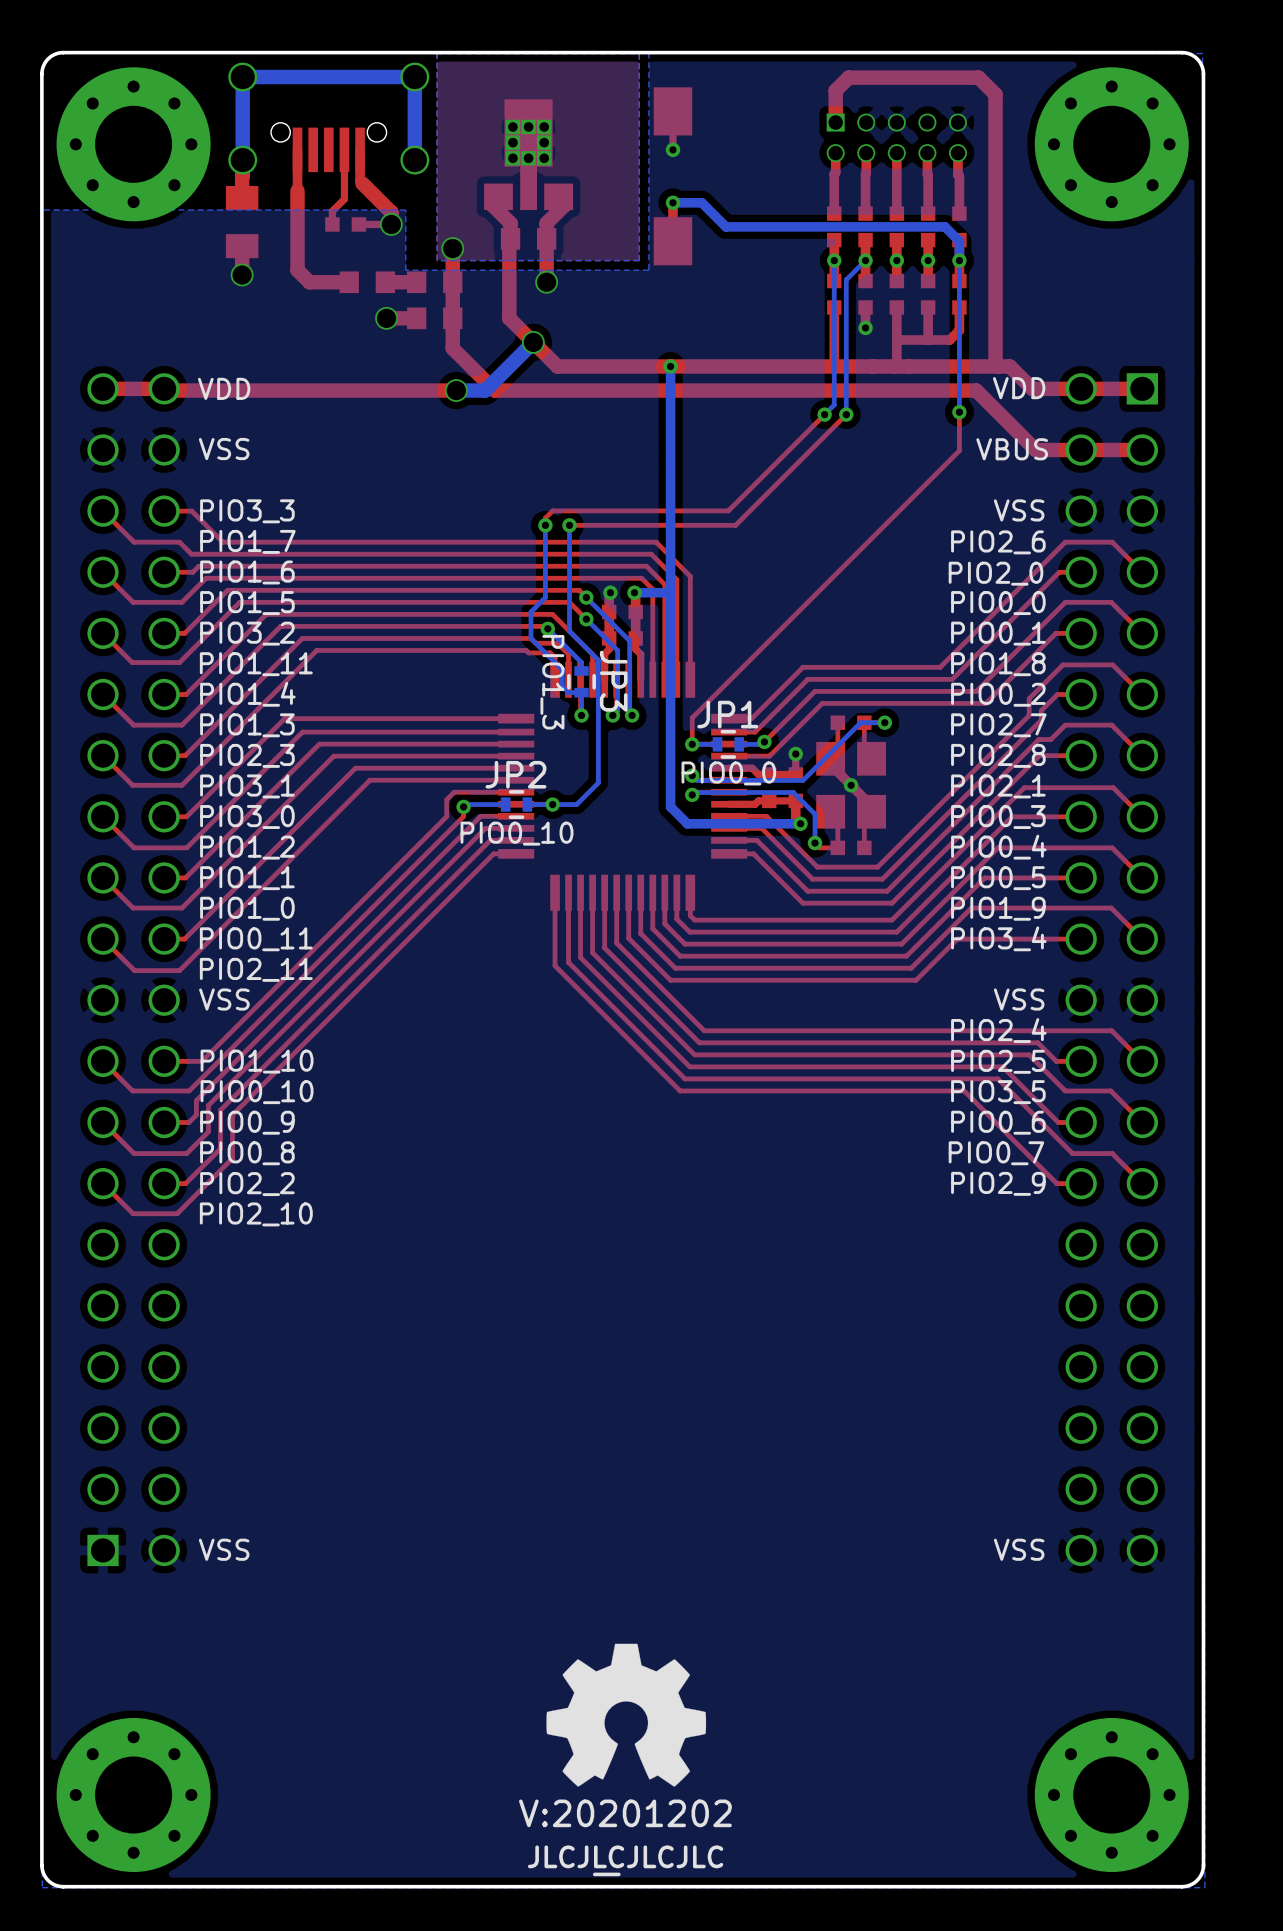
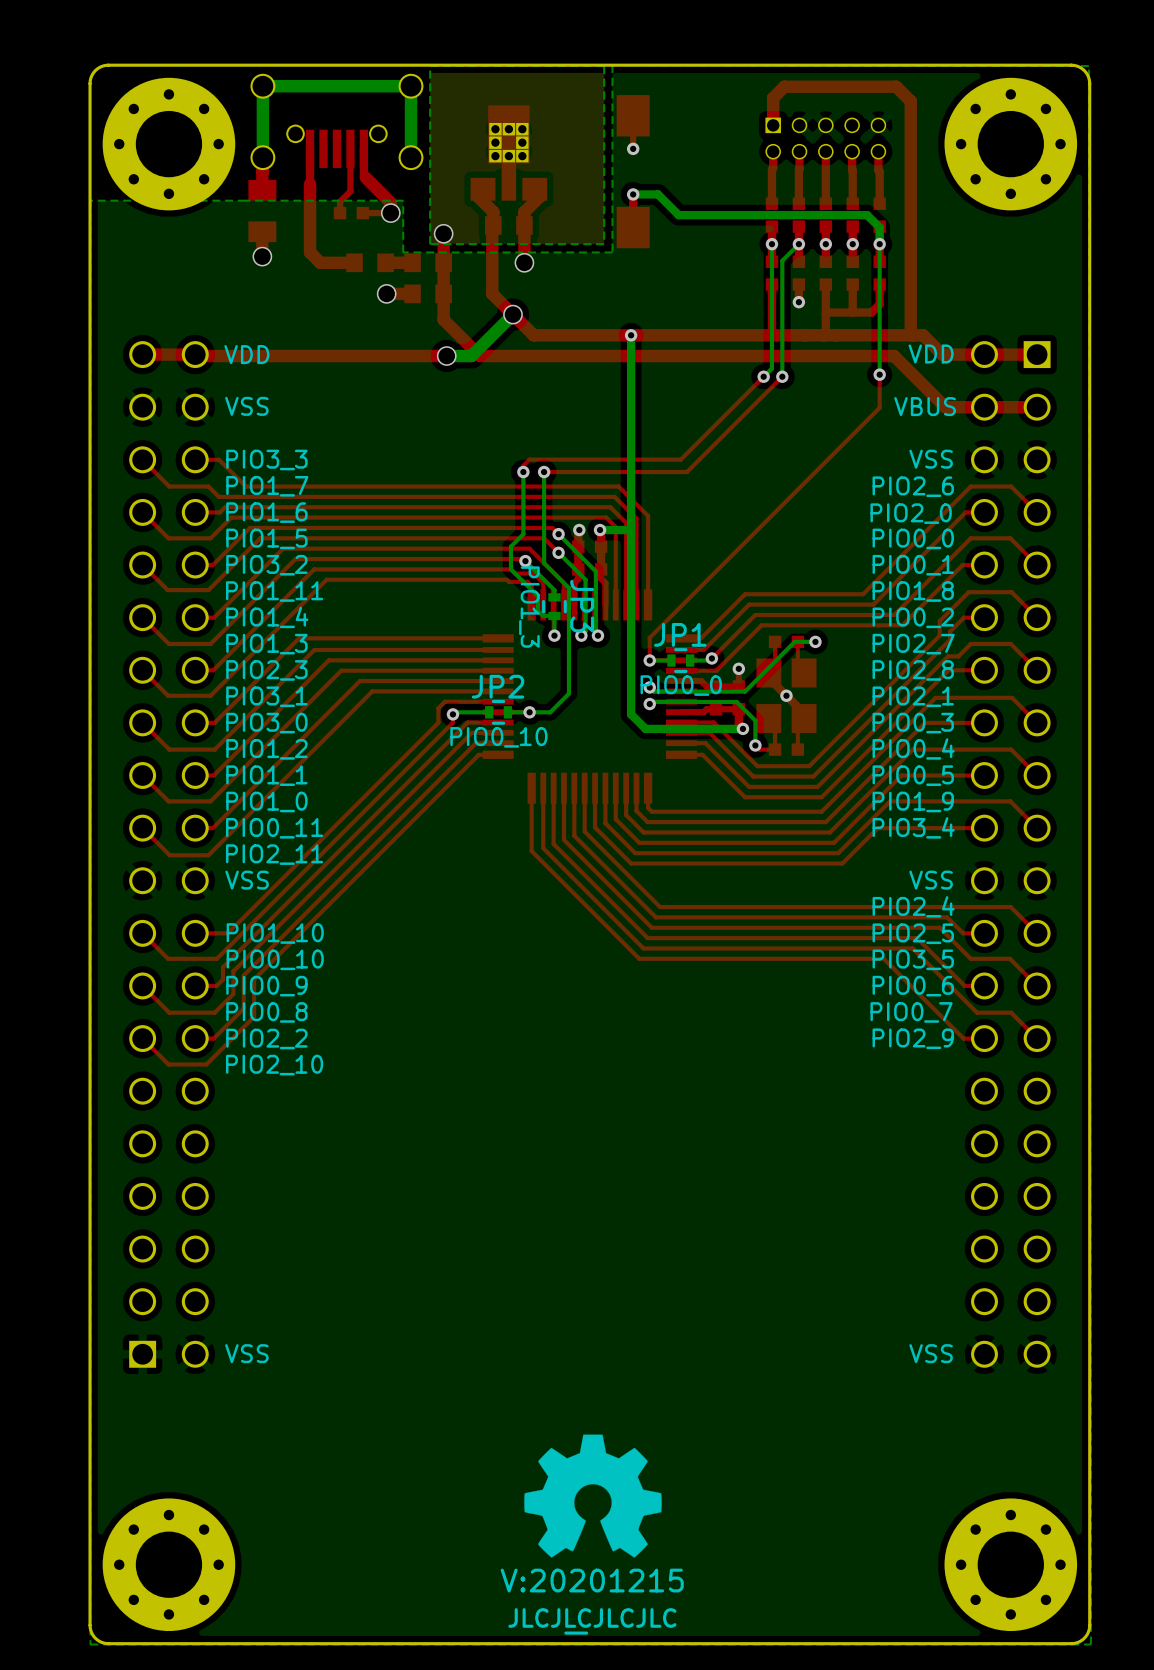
drawing shape: [519, 1799, 732, 1828] -> [500, 1568, 684, 1593]

